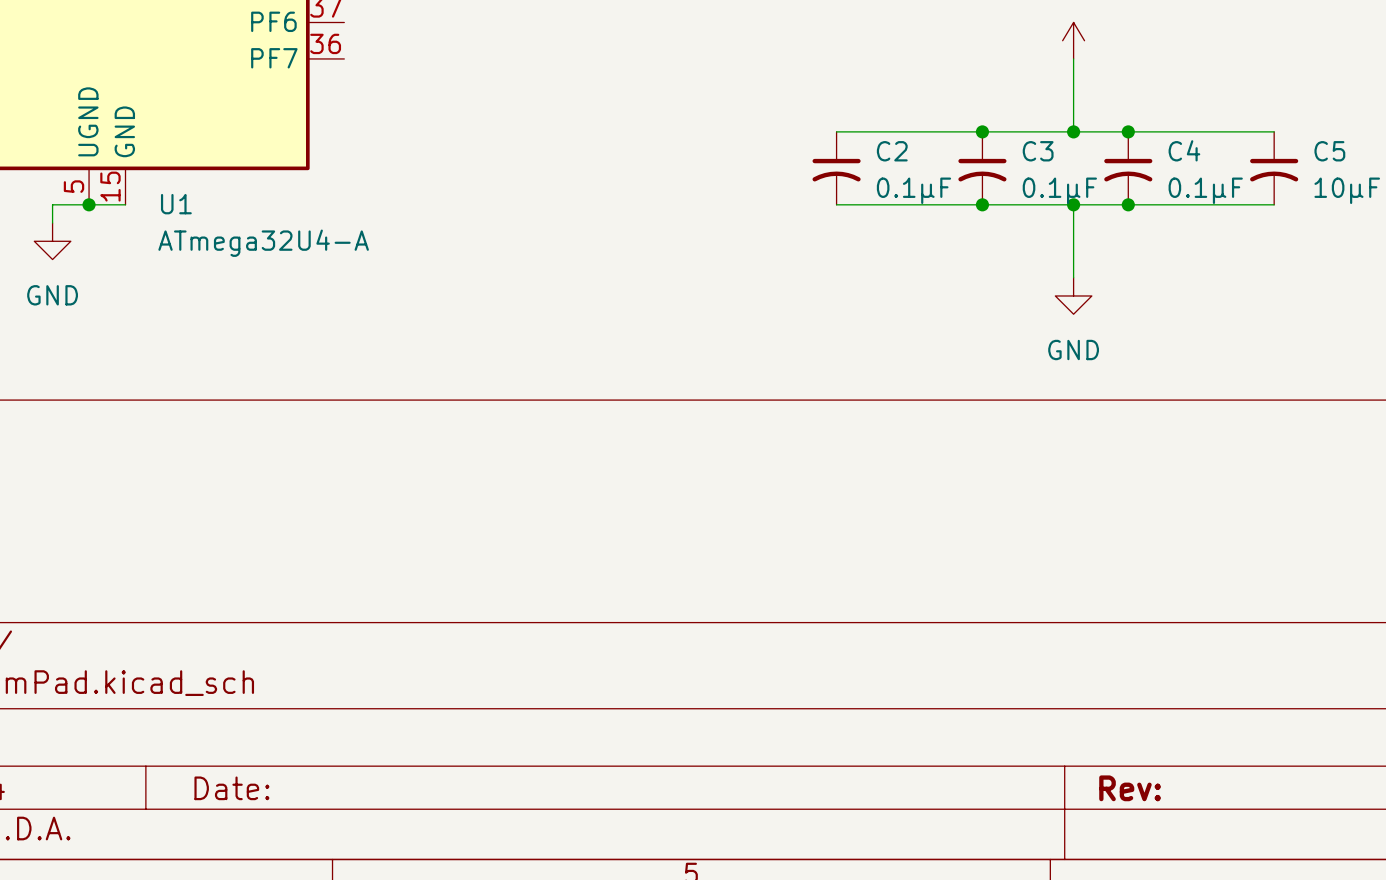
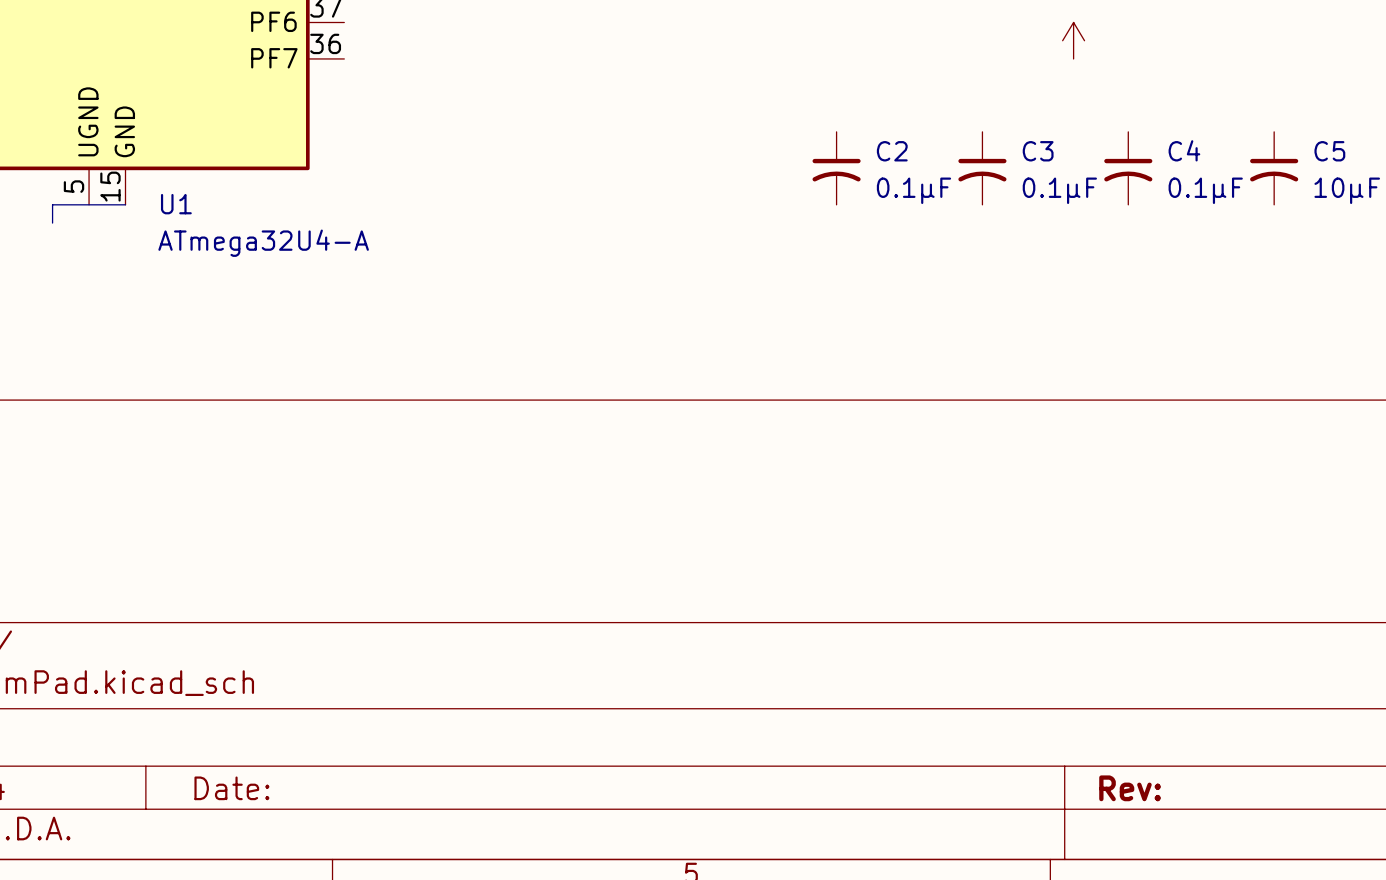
wire: (1073, 58) (1073, 131) -> none
wire: (836, 131) (1274, 131) -> none
junction: (982, 131) -> none
junction: (1073, 131) -> none
junction: (1128, 131) -> none
junction: (89, 204) -> none
wire: (836, 204) (1274, 204) -> none
junction: (982, 204) -> none
wire: (1073, 204) (1073, 277) -> none
junction: (1073, 204) -> none
junction: (1128, 204) -> none
power symbol: GND (52, 241) -> none
power symbol: GND (1073, 295) -> none

